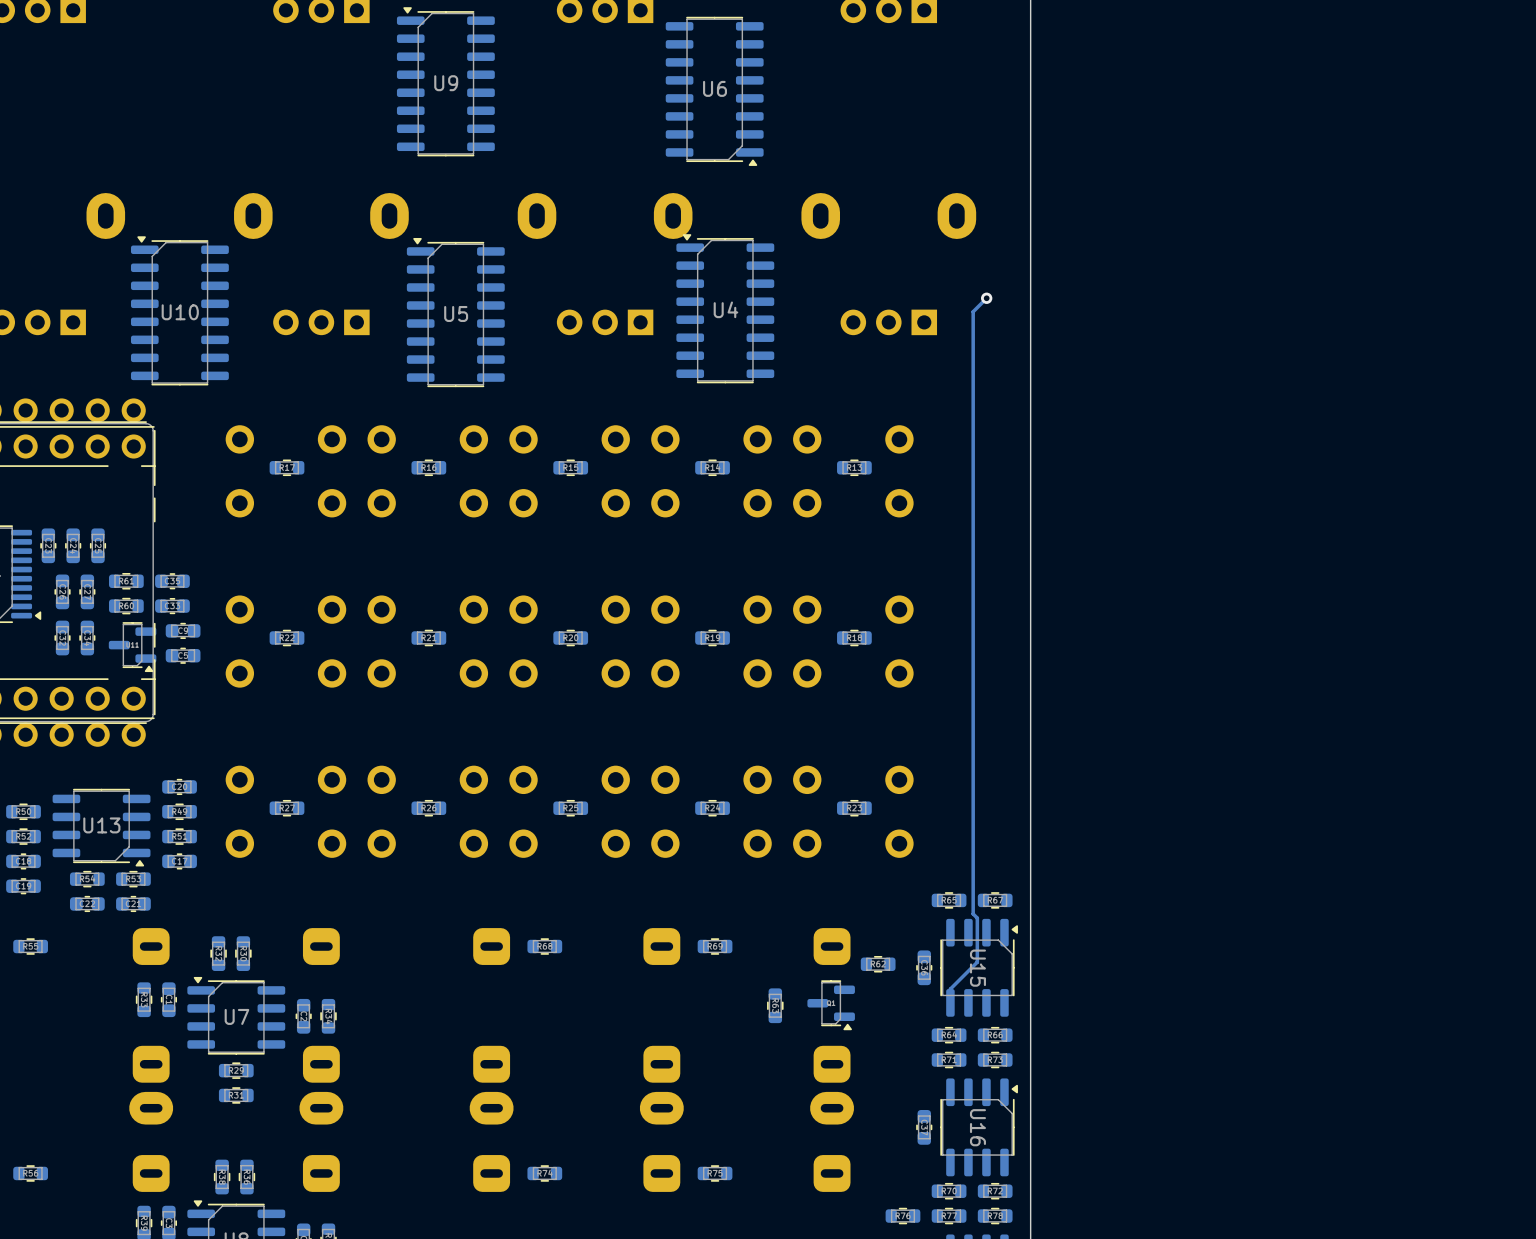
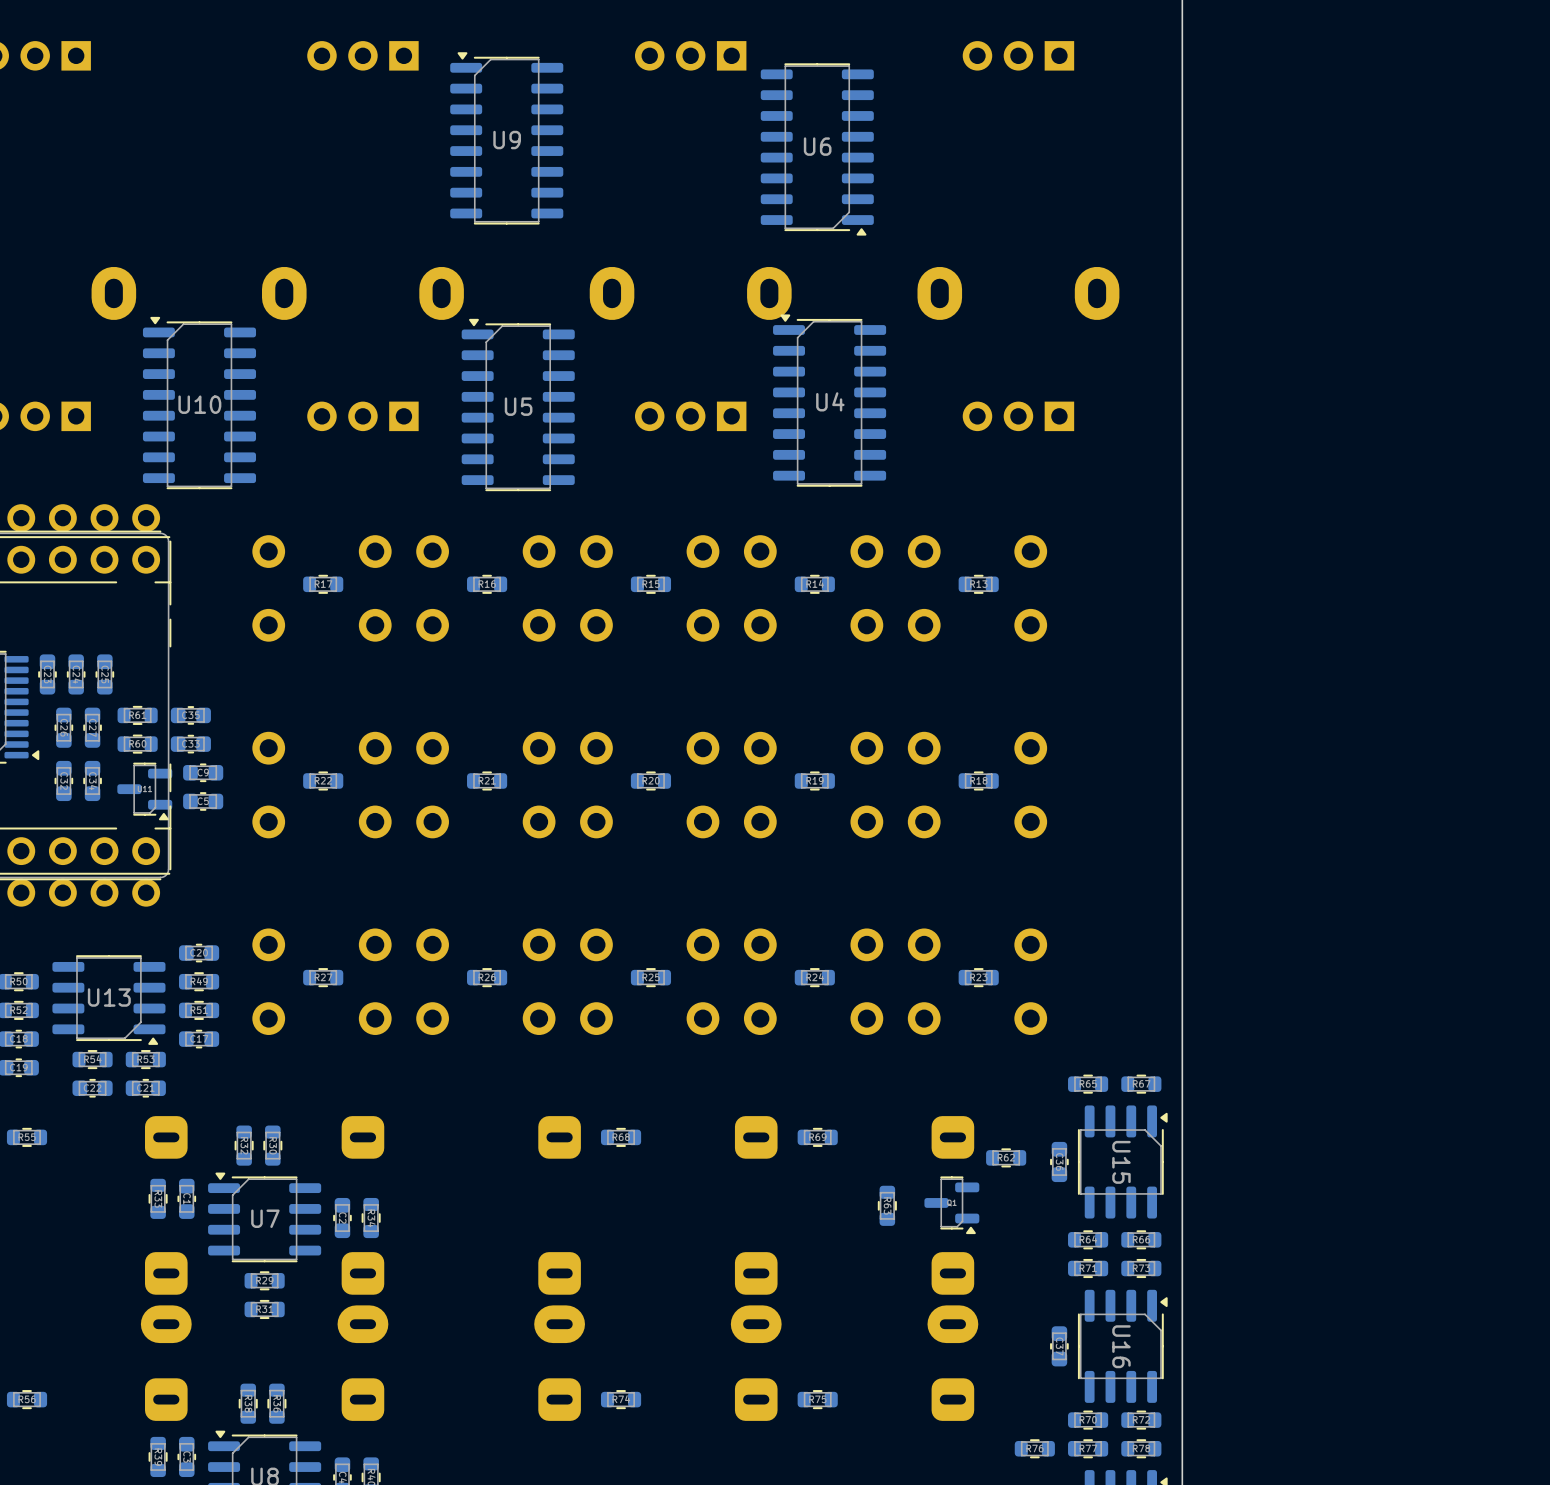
track: (986, 298) (973, 311) (973, 913) (977, 918) (977, 962) (950, 989) (950, 1002) -> none
via: (986, 298) -> none

